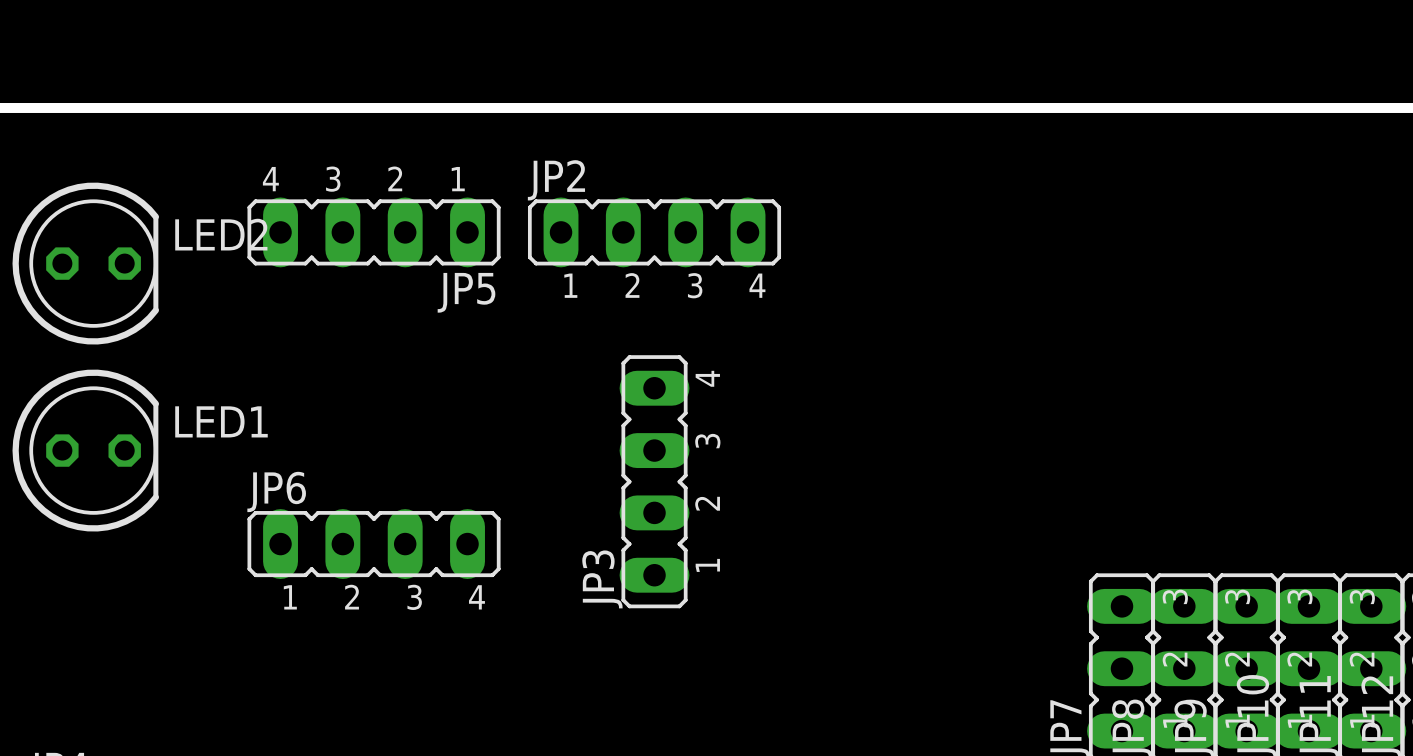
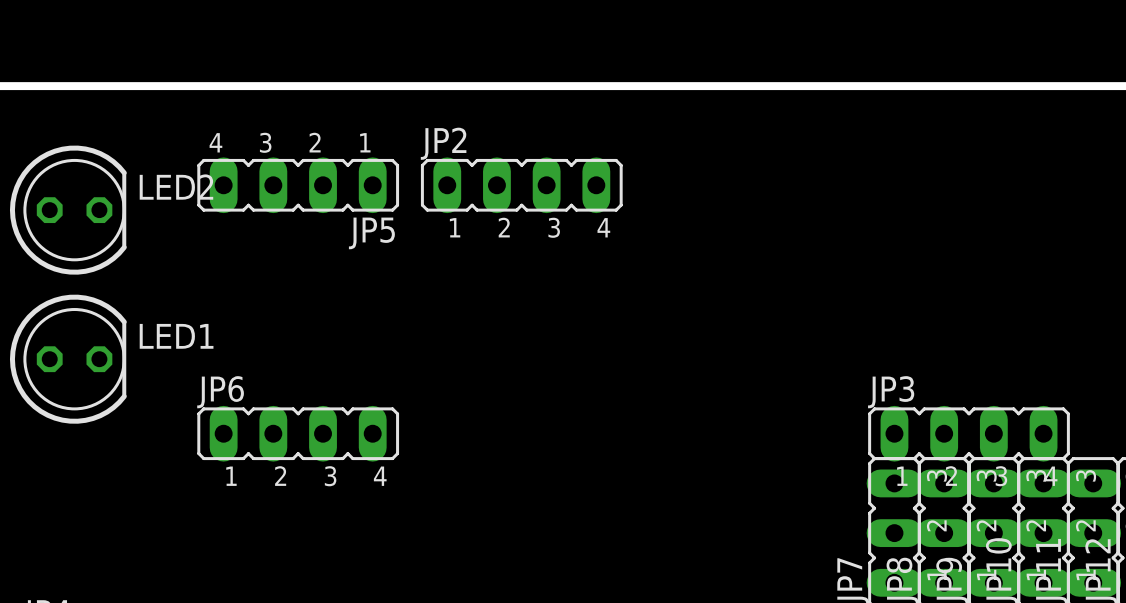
JP3 rotation: 0° (654, 481) -> 90° clockwise (969, 433)
JP3 position: (654, 481) -> (969, 433)

